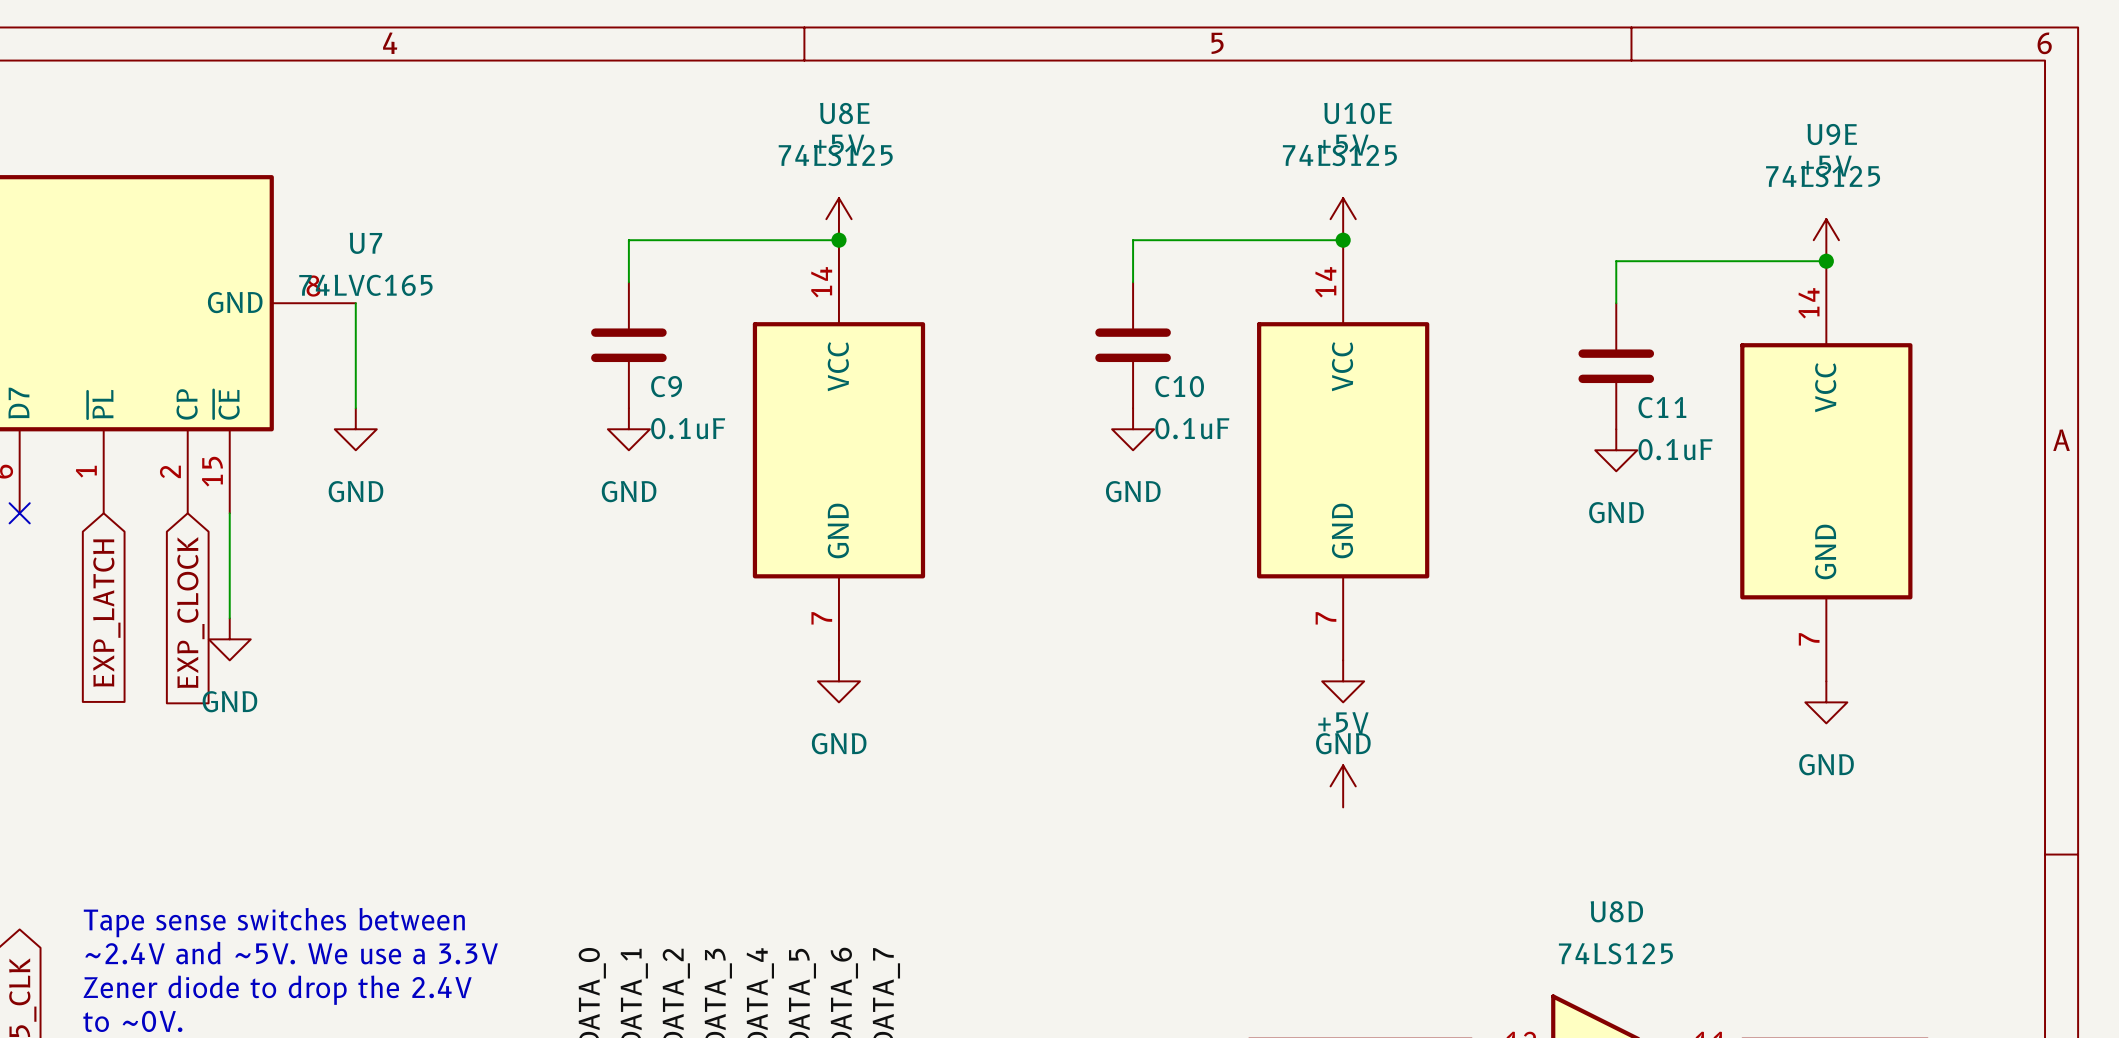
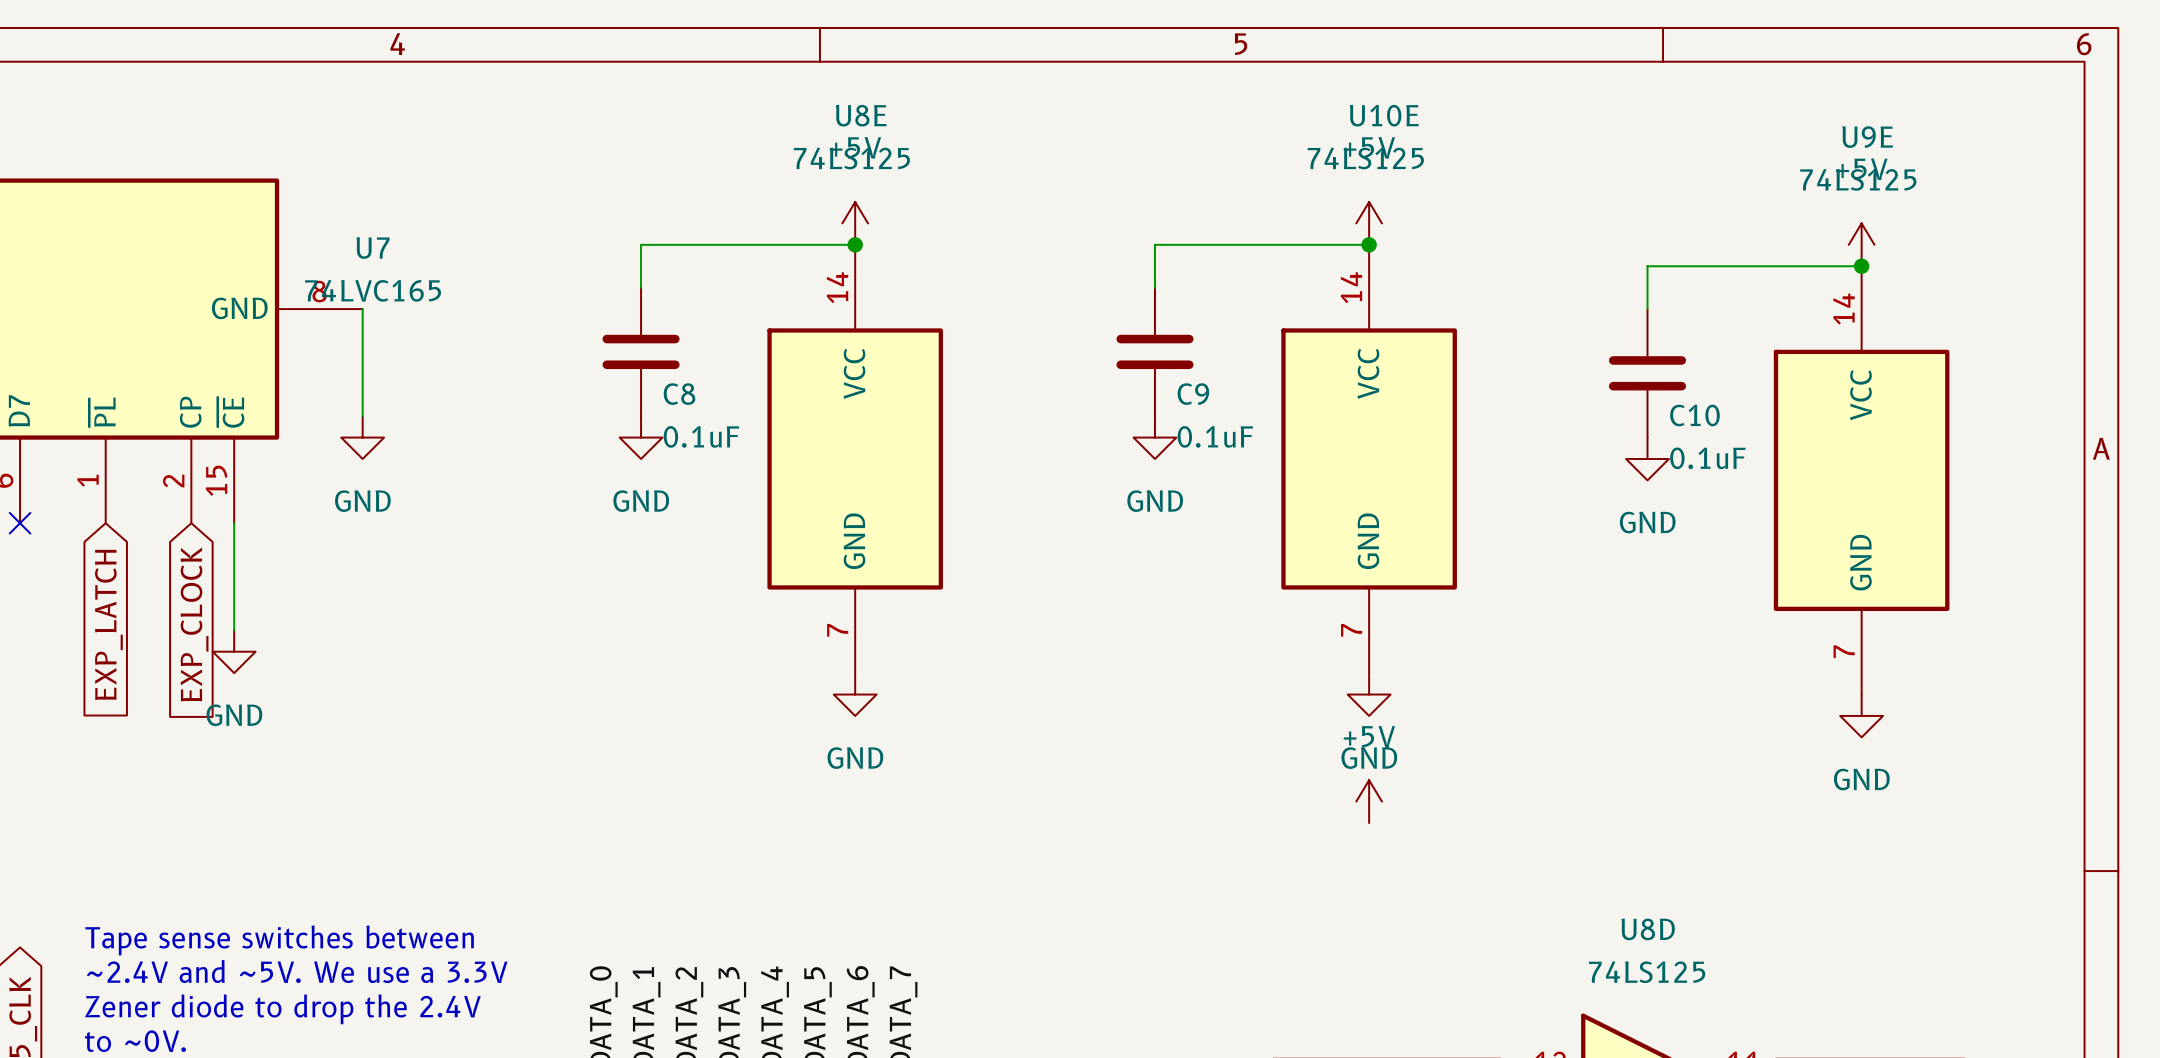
C9 name: C9 (666, 386) -> C8 (679, 394)
C10 name: C10 (1179, 386) -> C9 (1193, 394)
C11 name: C11 (1662, 407) -> C10 (1694, 415)

